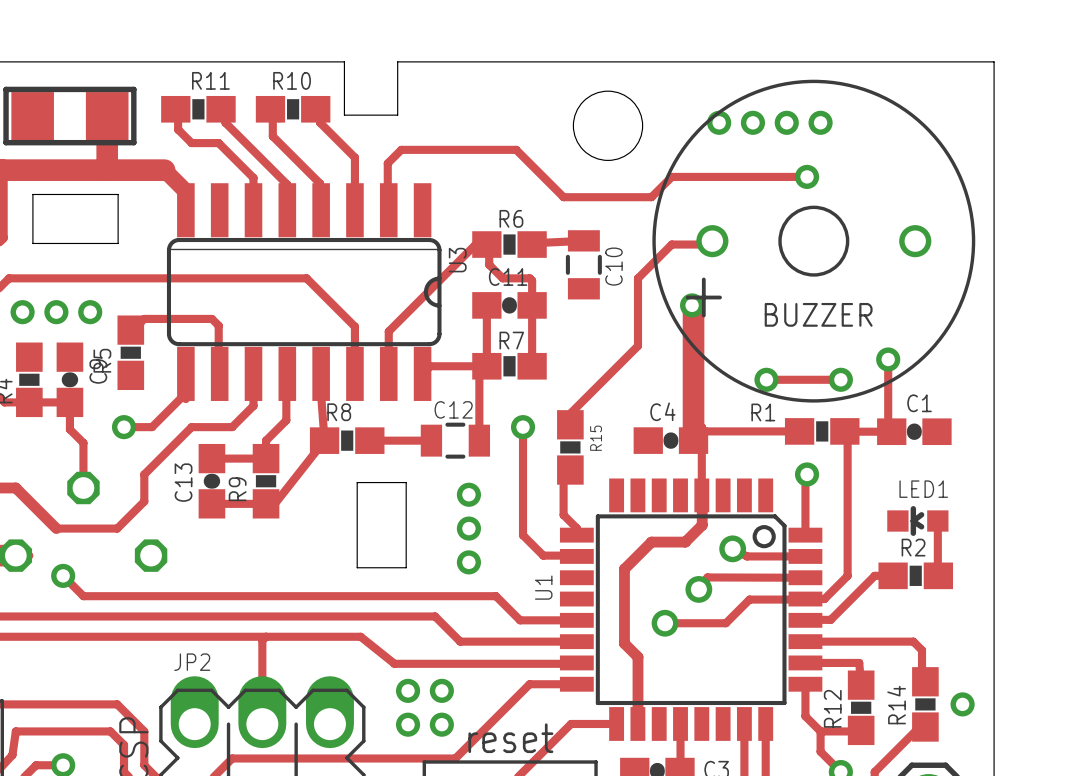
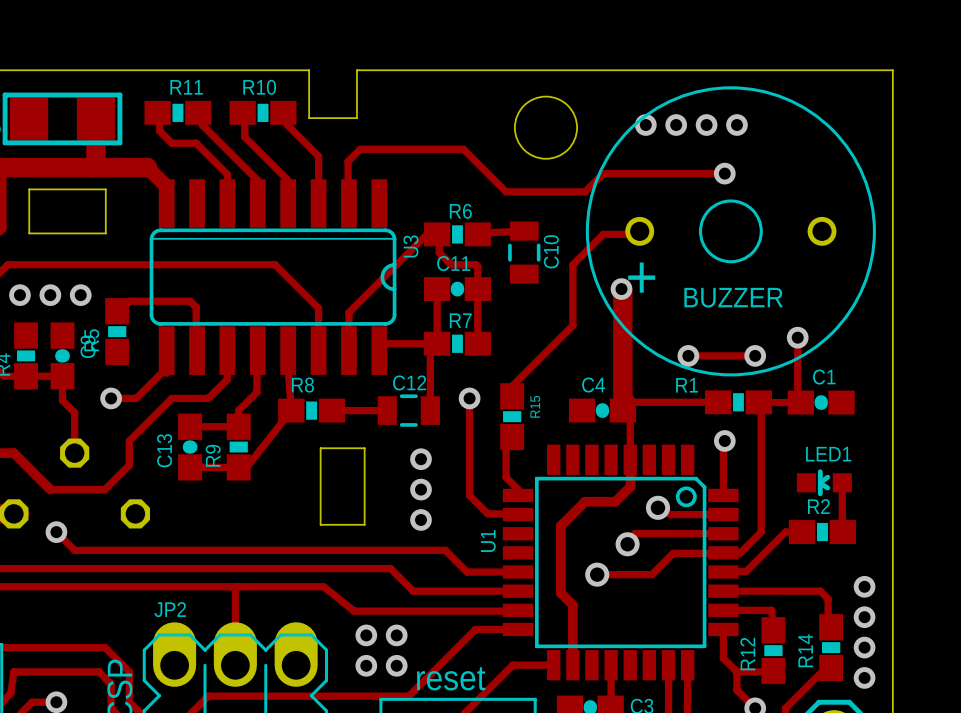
via: none -> (864, 586)
via: none -> (864, 617)
via: none -> (864, 677)

